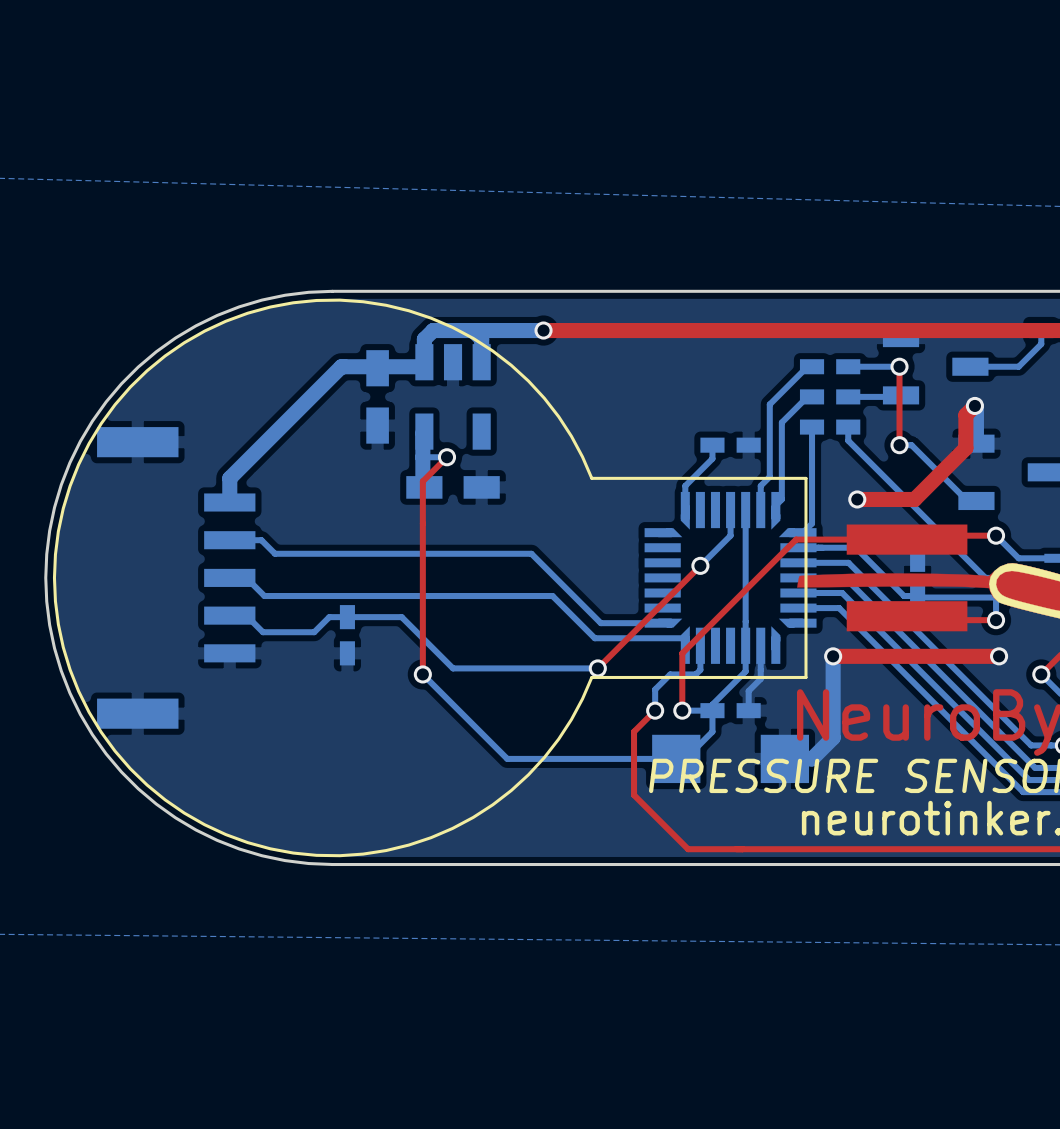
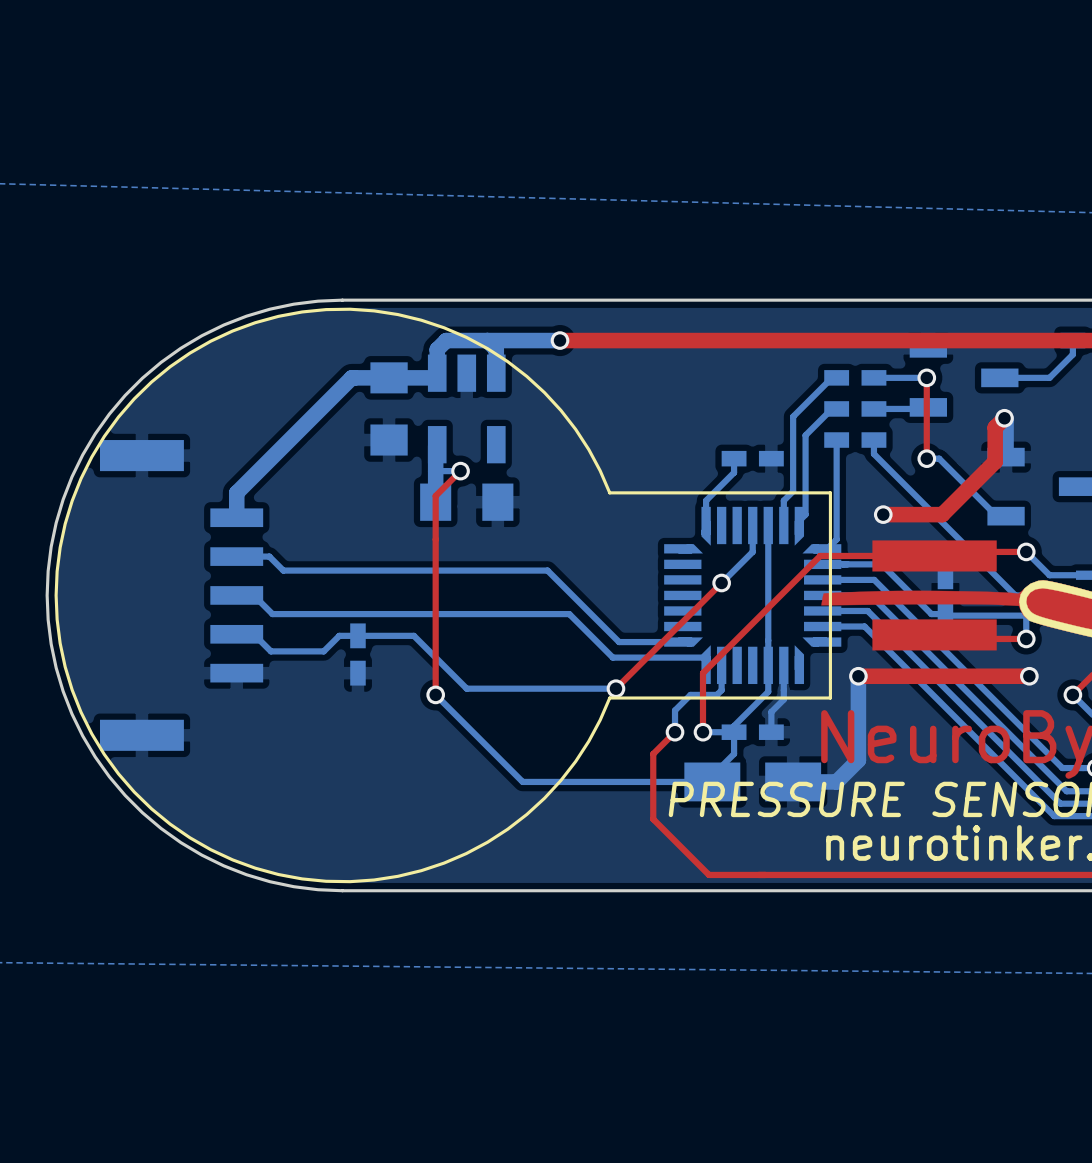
part footprint: [366, 350, 389, 444] -> [370, 362, 408, 456]
part footprint: [406, 476, 500, 499] -> [420, 483, 514, 521]
part footprint: [652, 734, 810, 784] -> [684, 762, 822, 802]

